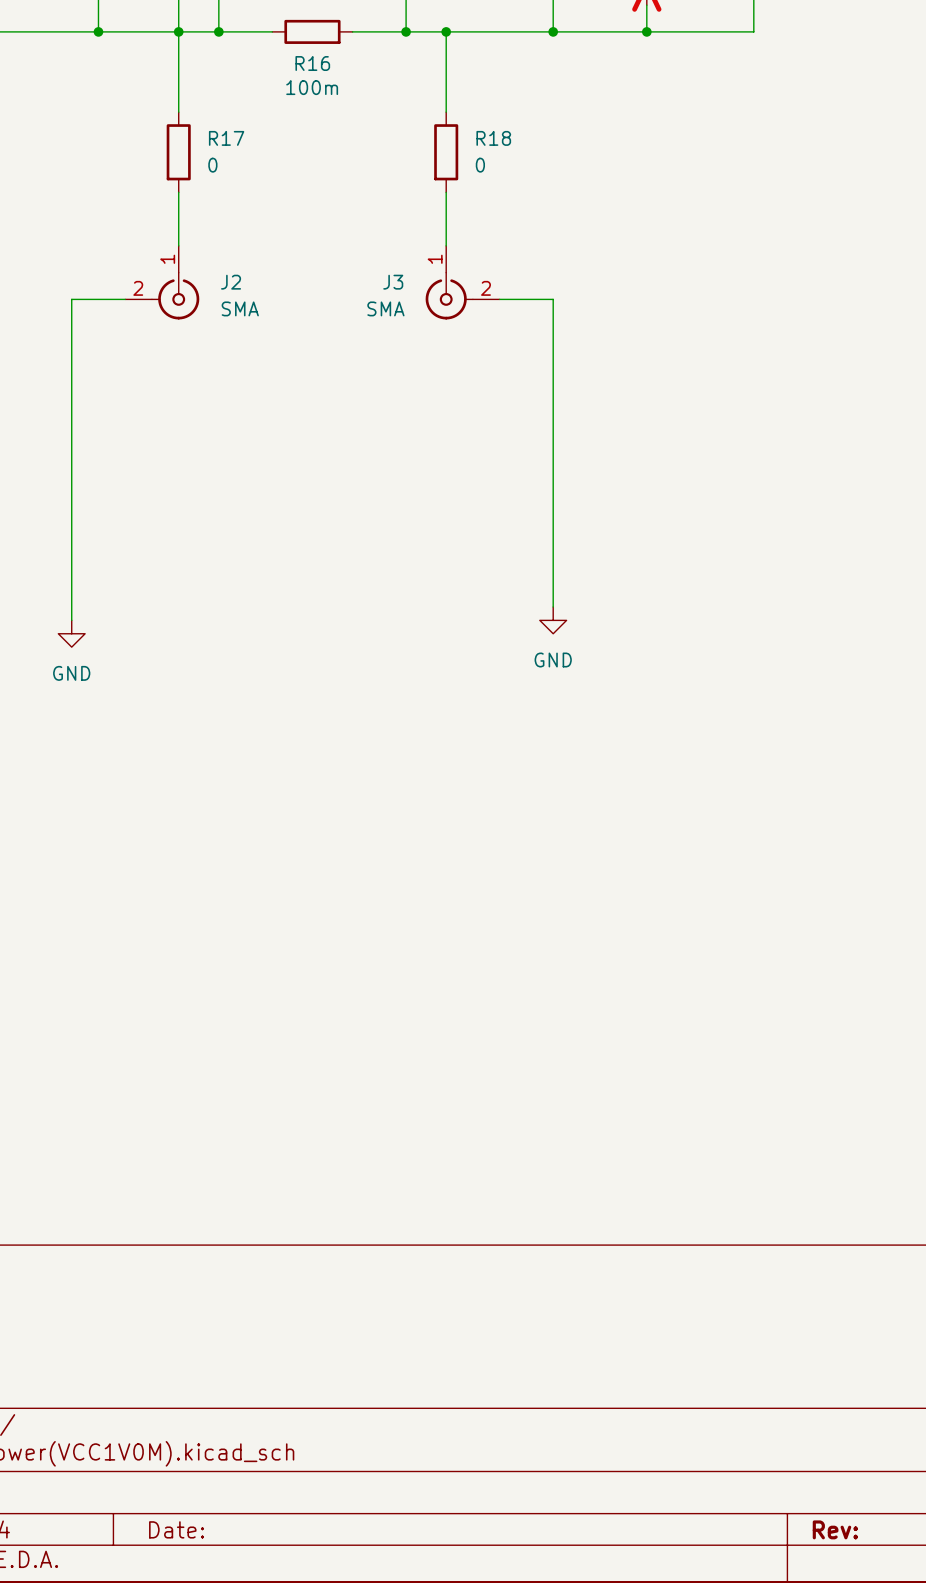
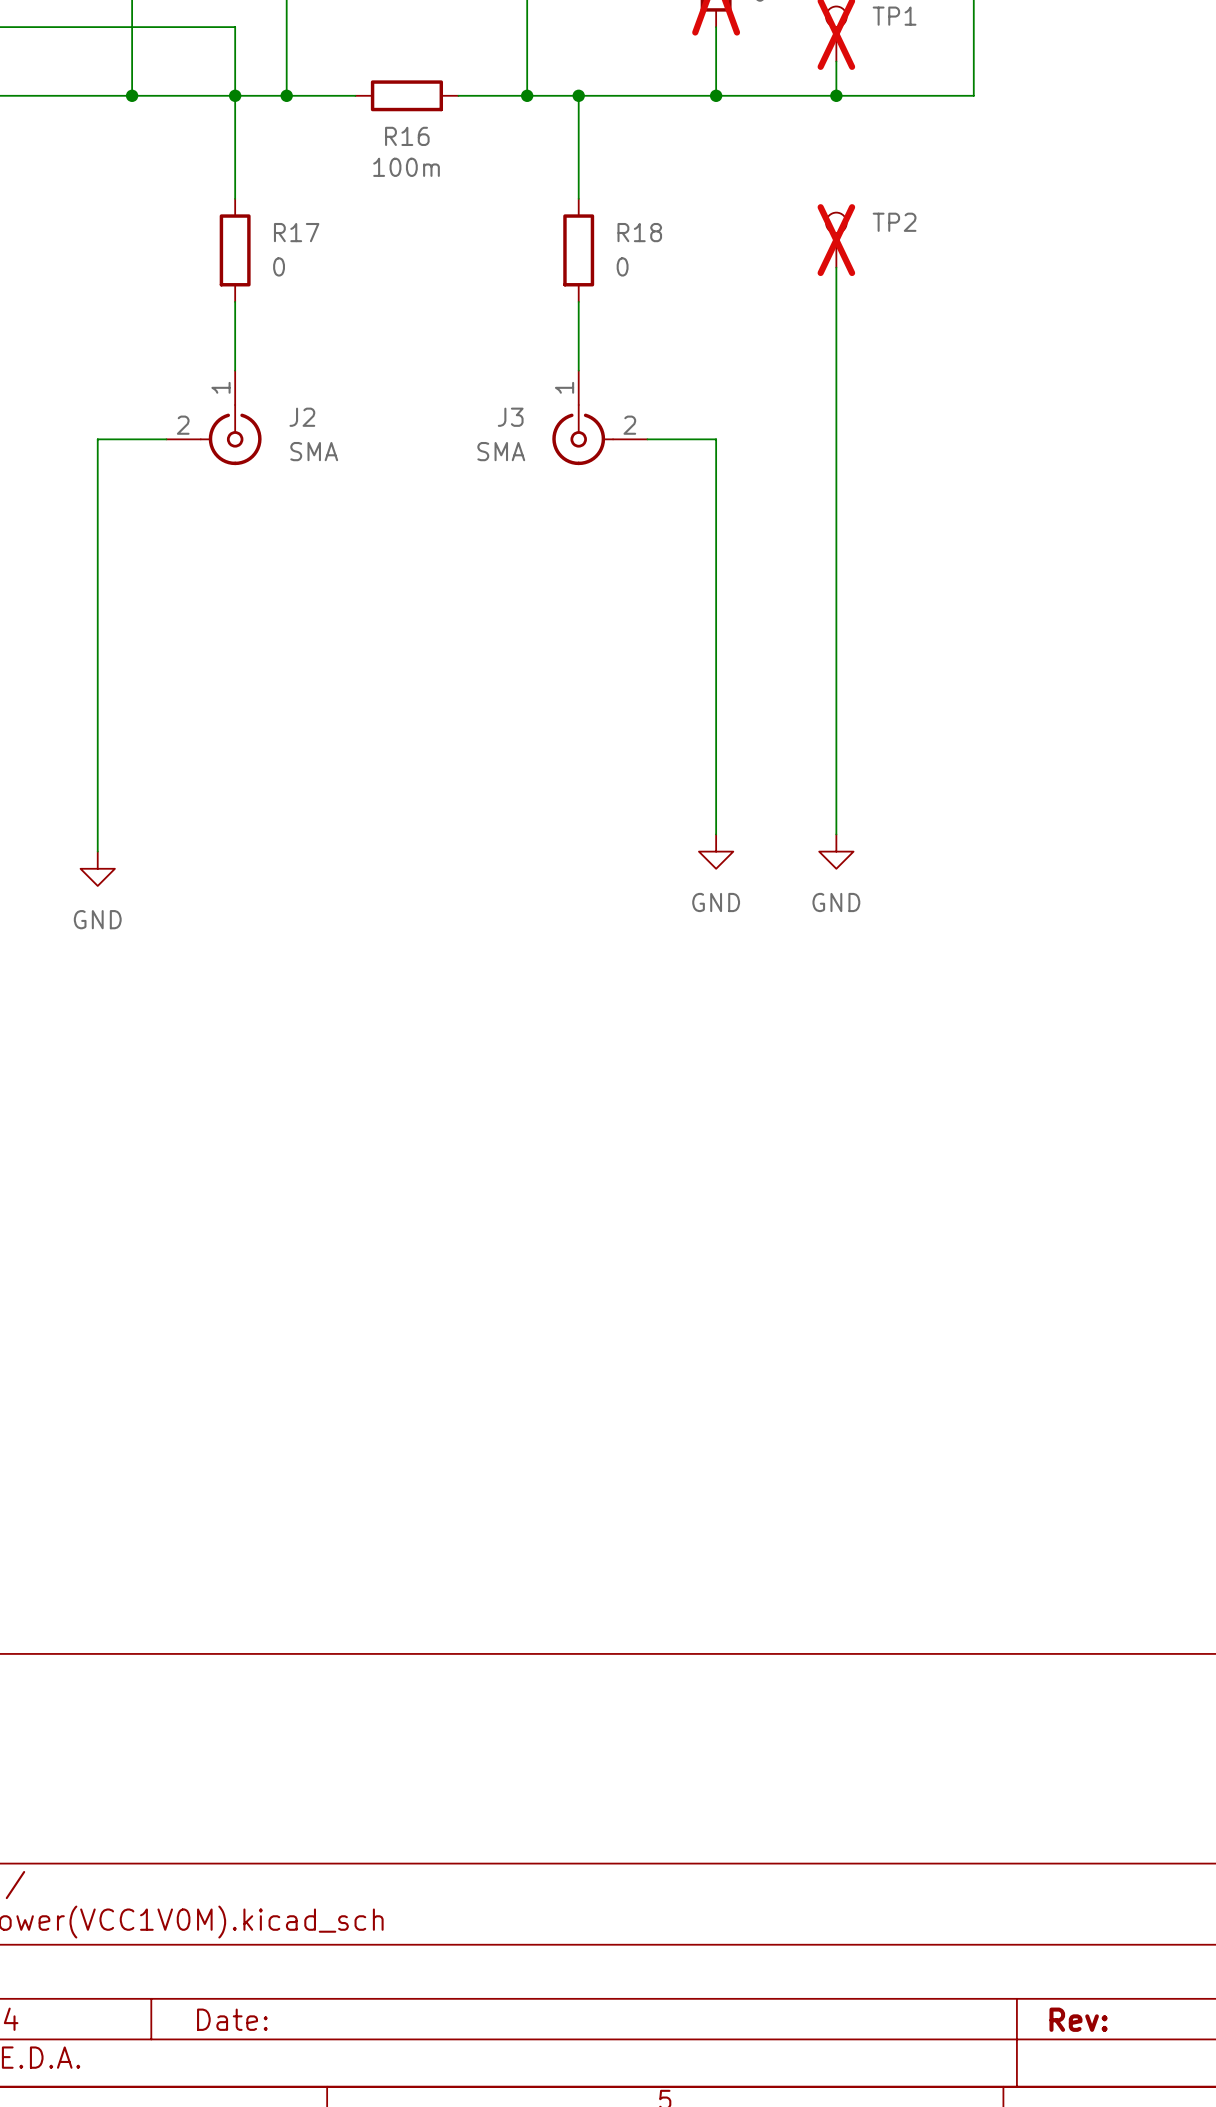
TP2: none -> (836, 240)
wire: none -> (836, 267) (836, 834)
power symbol: none -> GND (836, 851)

